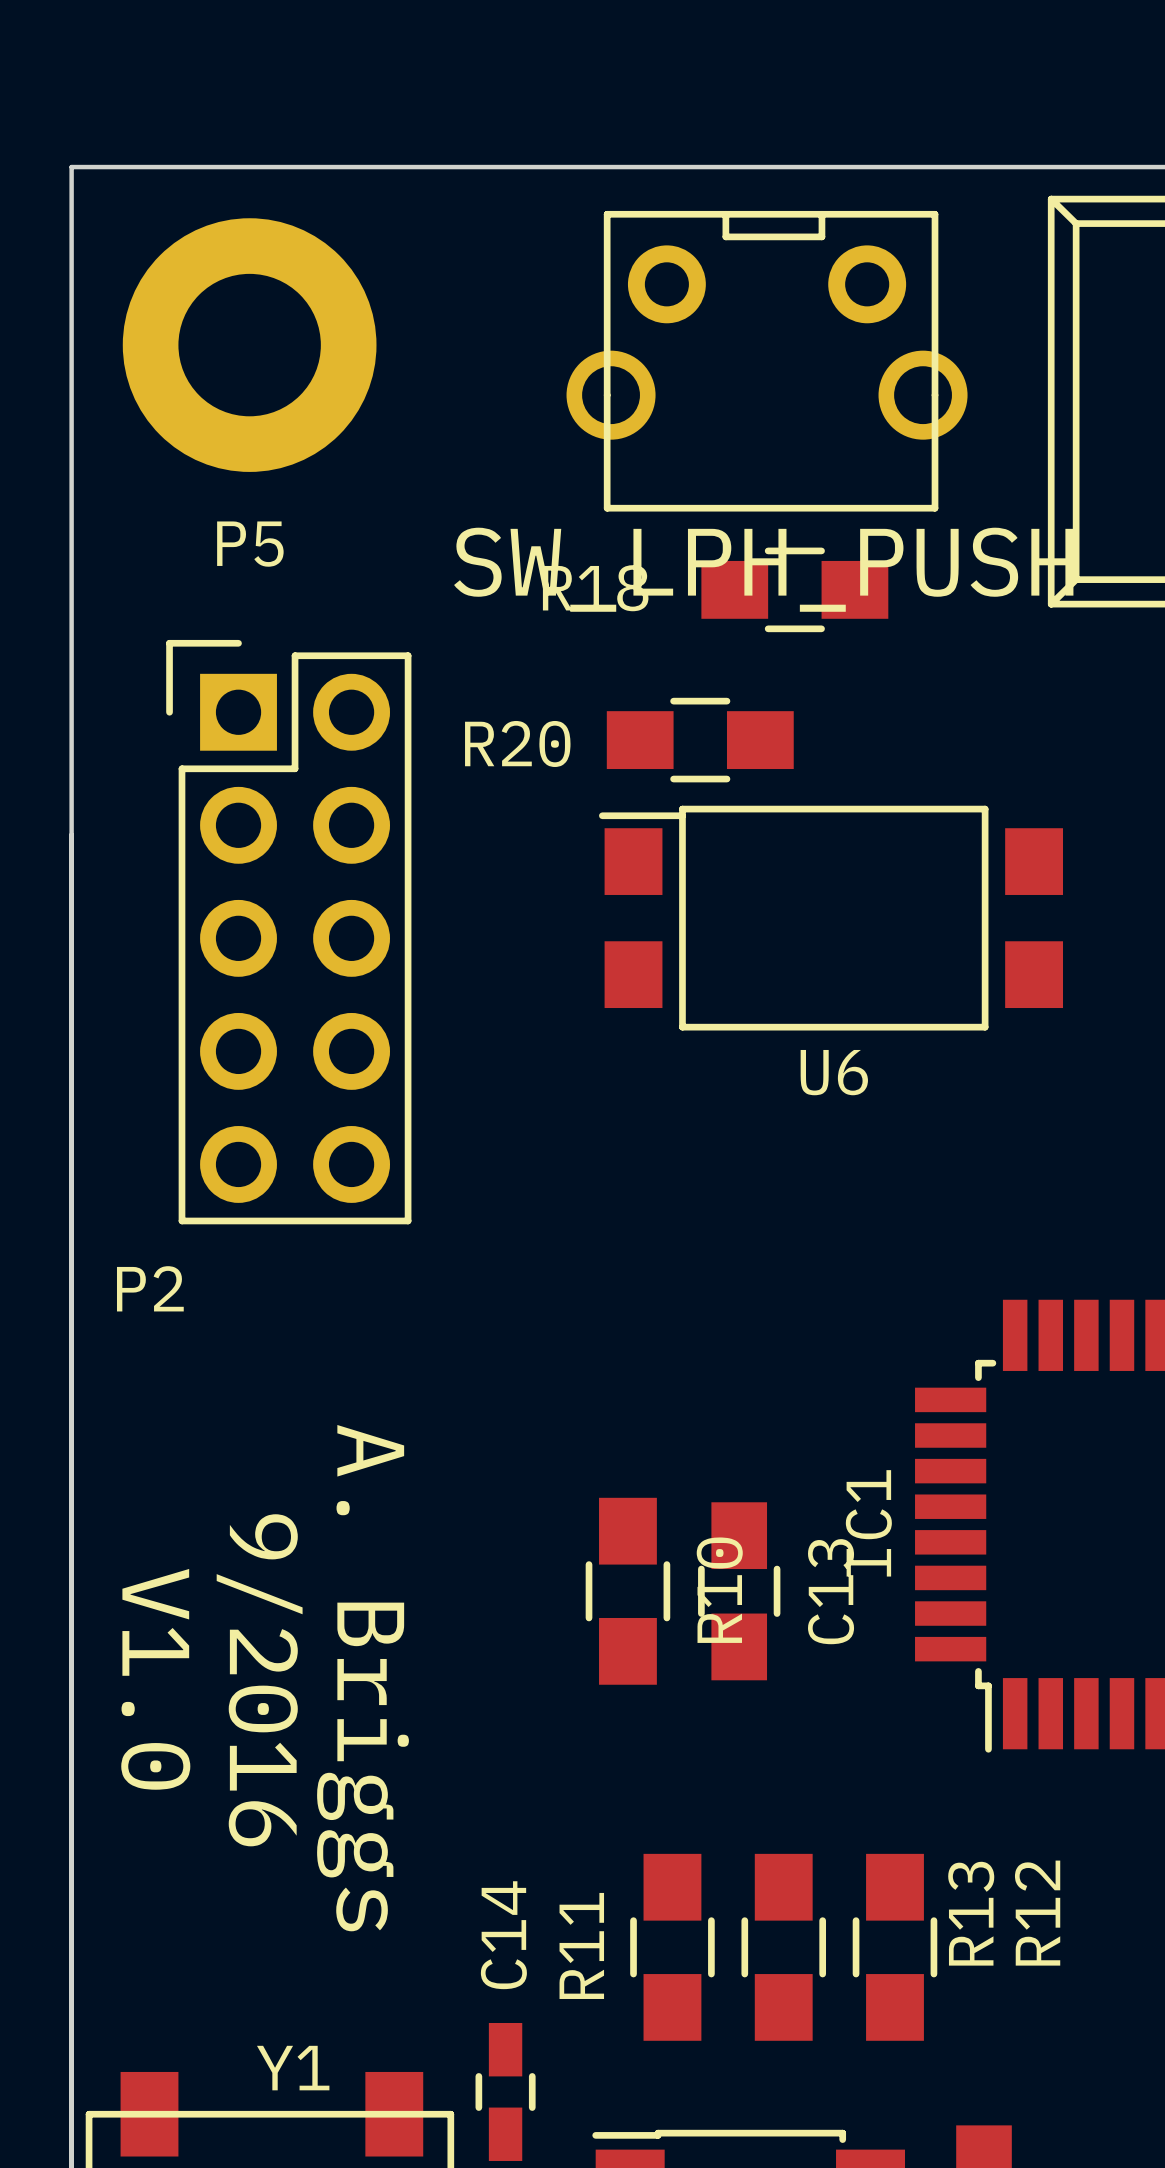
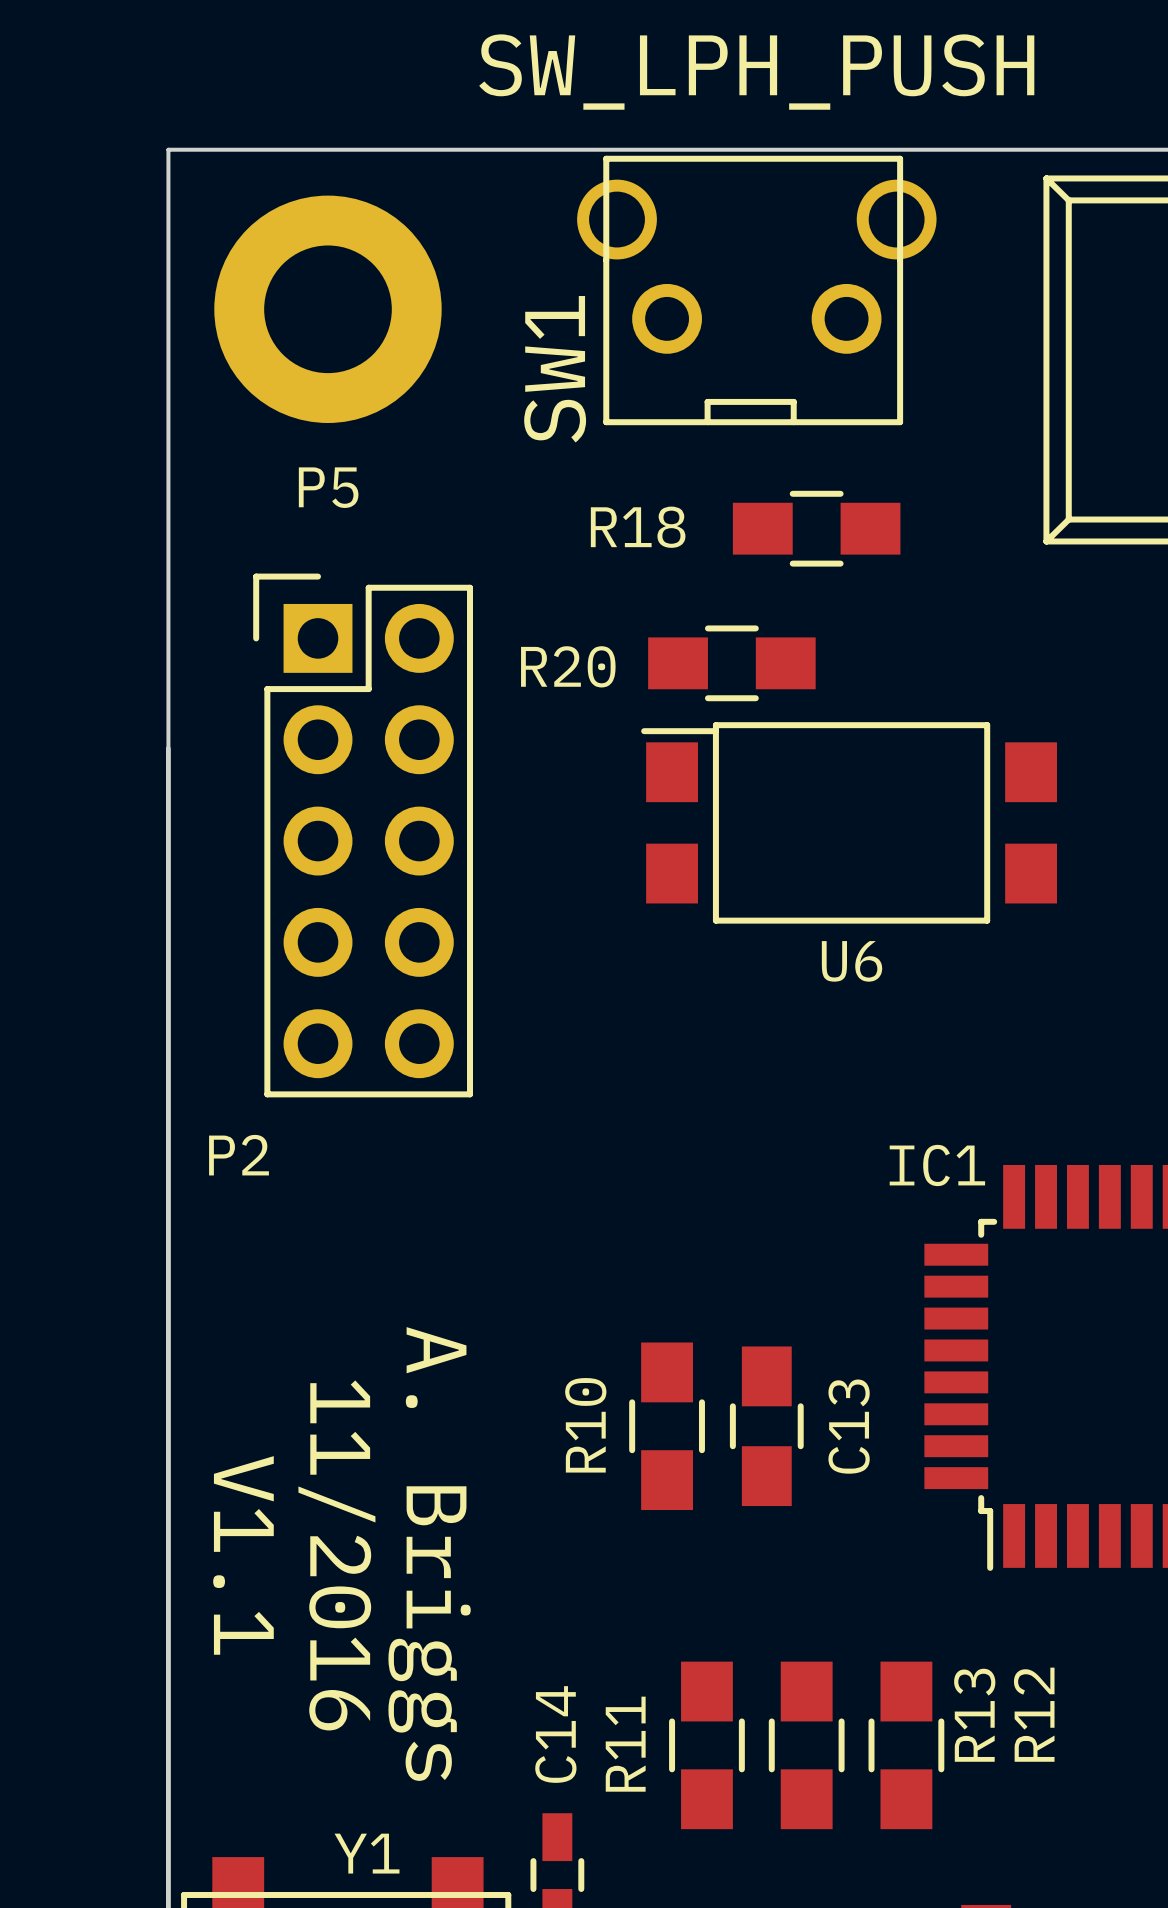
SW1: none -> SW_LPH_PUSH (756, 290)
part: SW_LPH_PUSH (767, 361) -> none
IC1 name rotation: 0° (868, 1523) -> 90° clockwise (937, 1165)
IC1 name position: IC1 (868, 1523) -> IC1 (937, 1165)
R10 name position: R10 (719, 1590) -> R10 (585, 1425)
text position: A. Briggs (363, 1678) -> A. Briggs (429, 1553)
text: V1.0 (155, 1679) -> V1.1 (243, 1555)
text: 9/2016 (259, 1680) -> 11/2016 (336, 1555)

